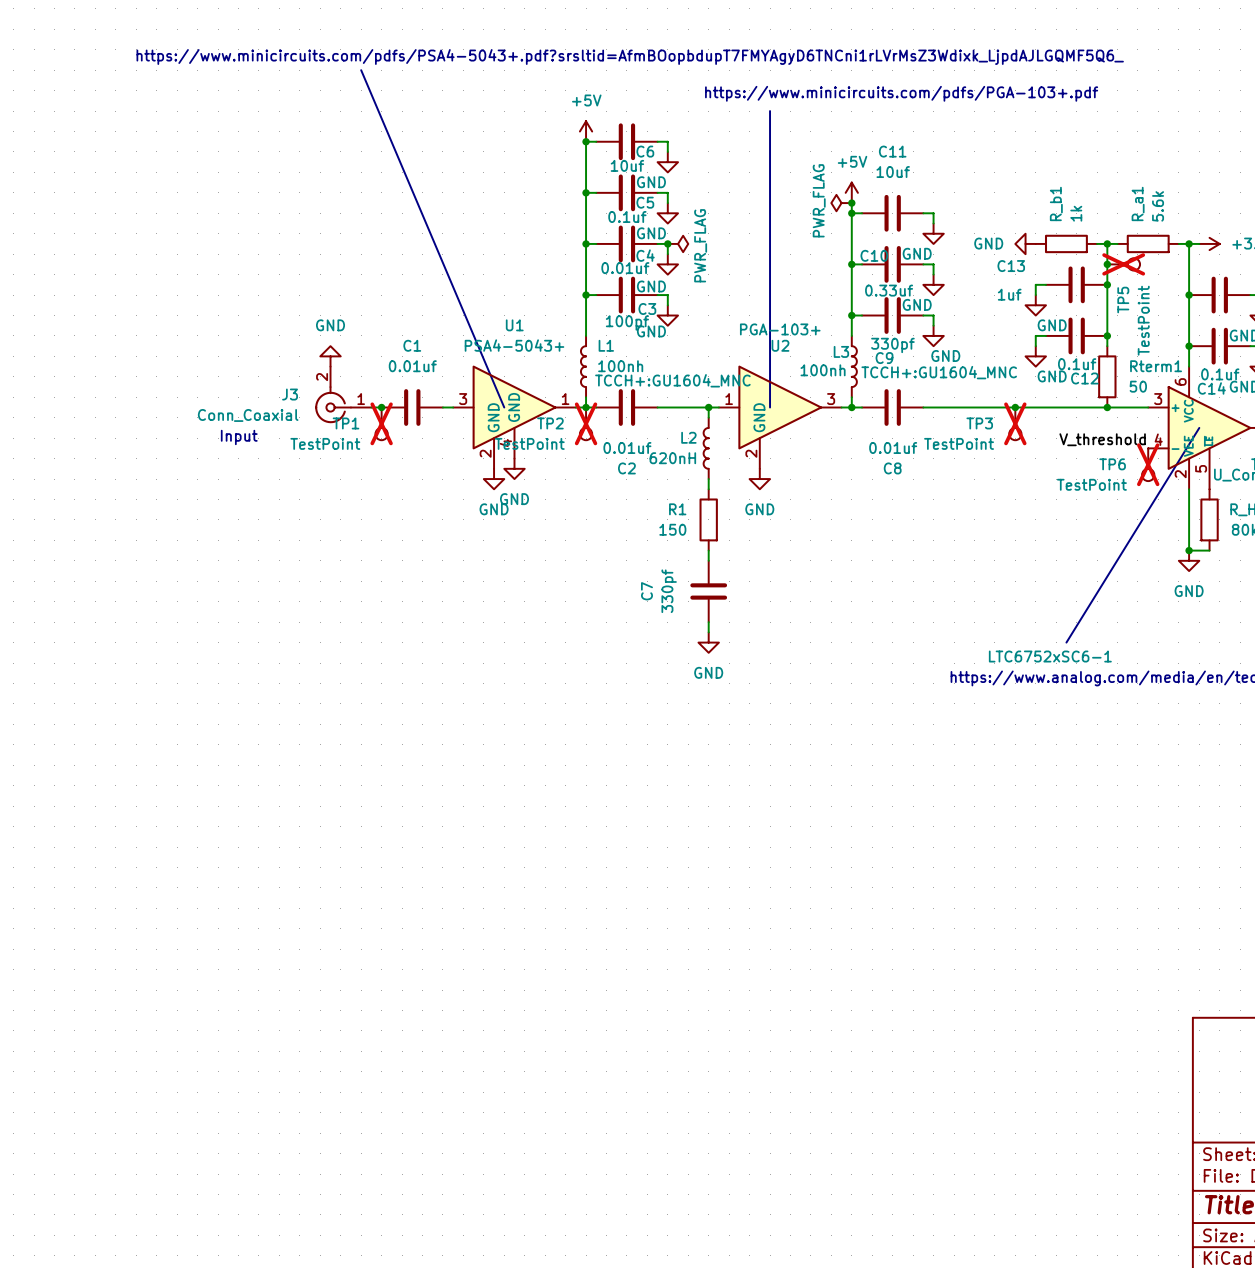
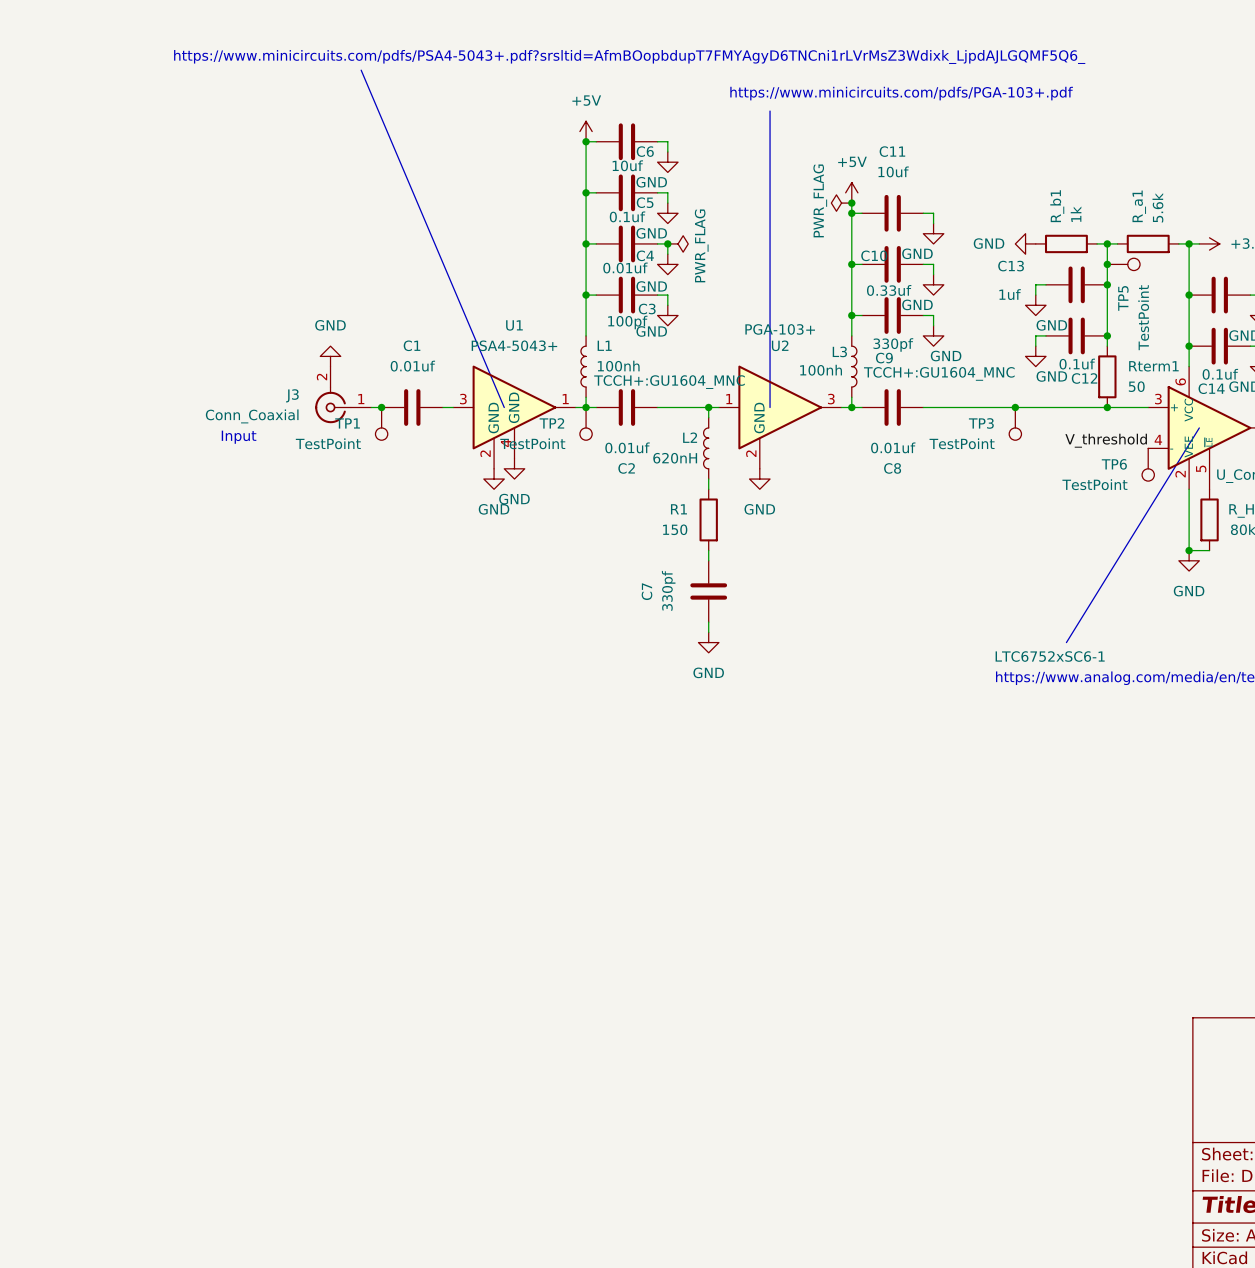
TP5 do-not-place cross: (1123, 264) -> none
TP1 do-not-place cross: (381, 423) -> none
TP2 do-not-place cross: (586, 423) -> none
TP3 do-not-place cross: (1015, 423) -> none
TP6 do-not-place cross: (1148, 464) -> none

